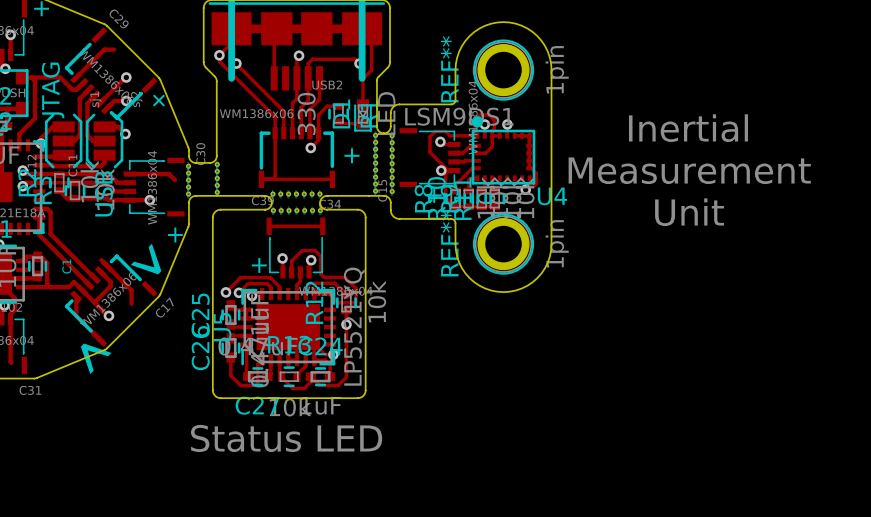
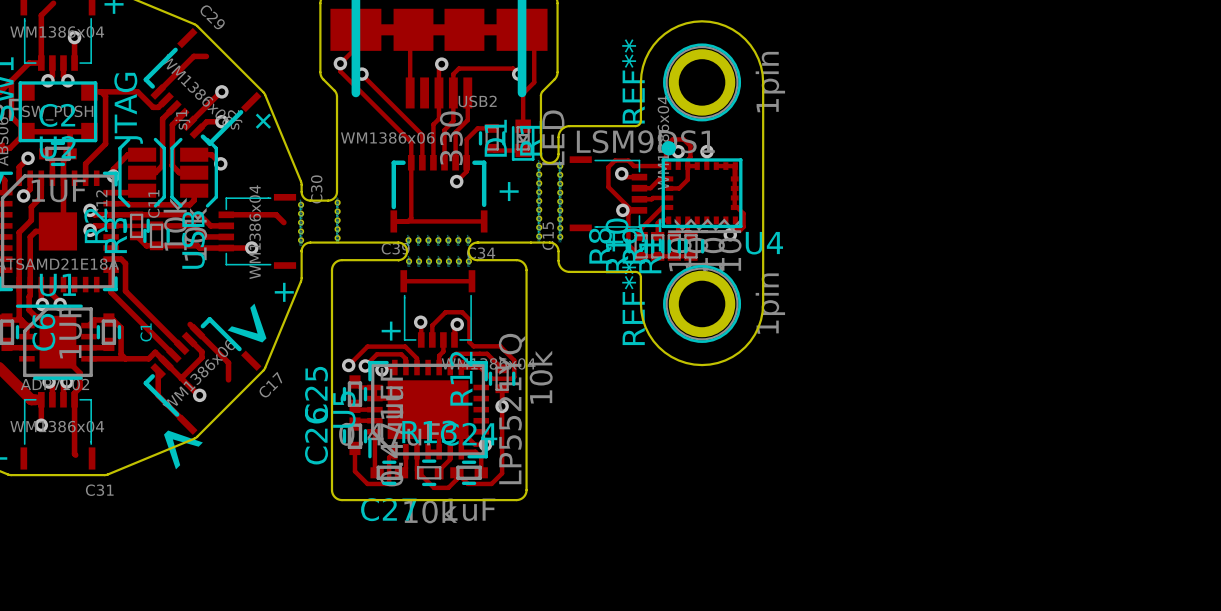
text: Inertial (688, 128) -> none
text: Measurement (689, 170) -> none
text: Unit (689, 212) -> none
text: Status LED (286, 438) -> none

